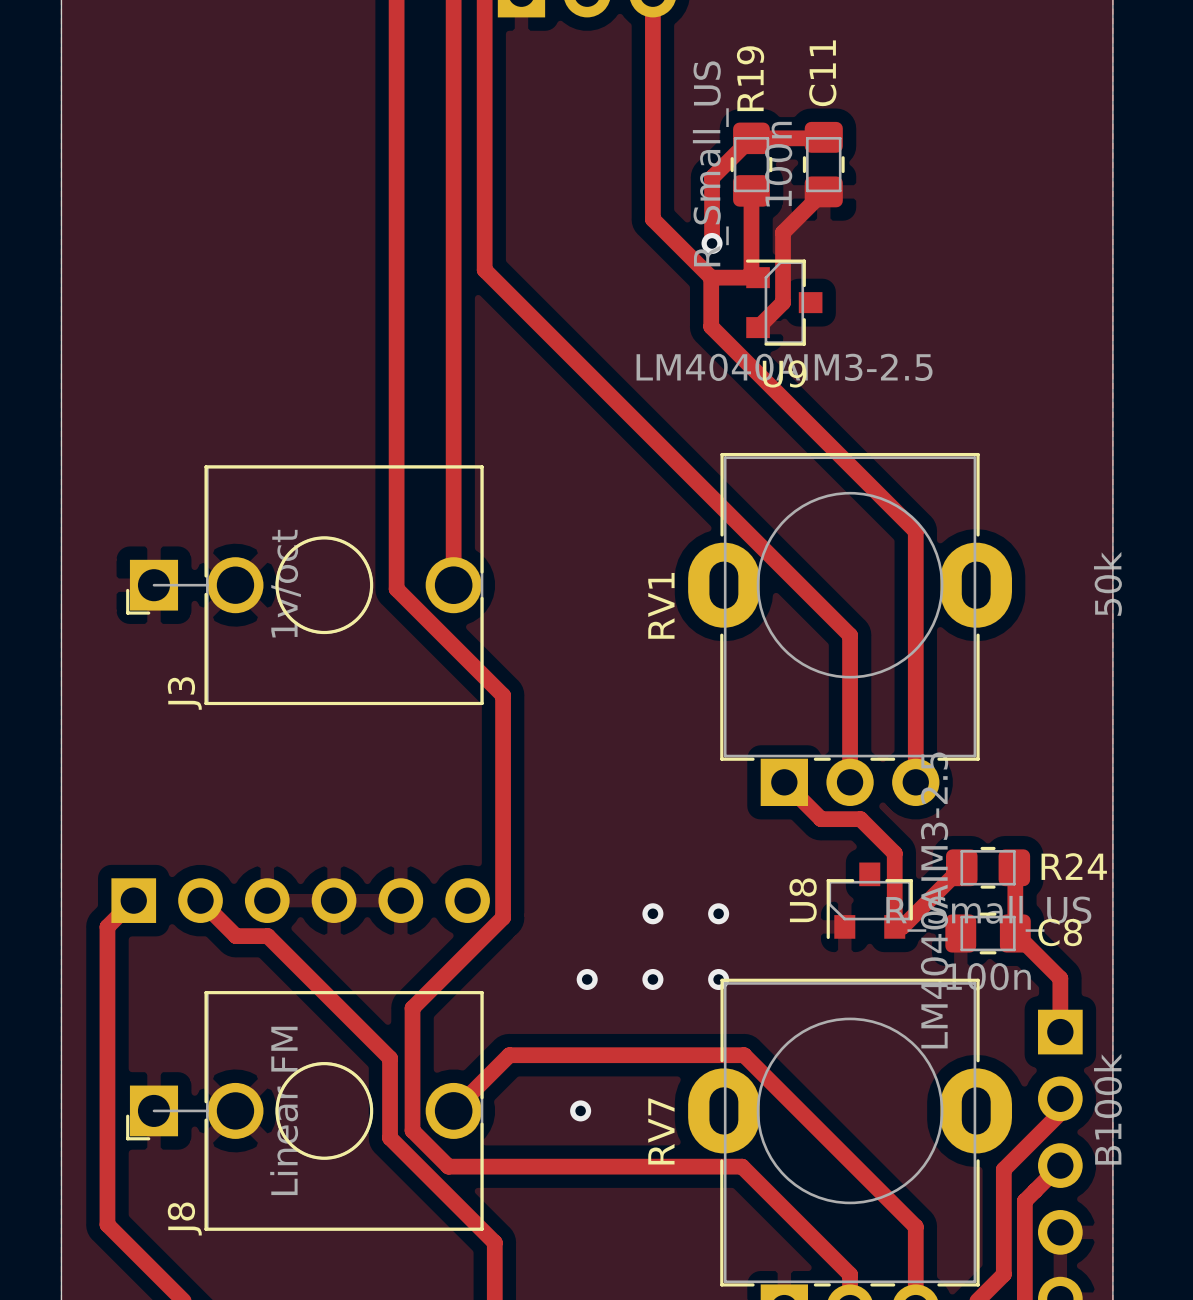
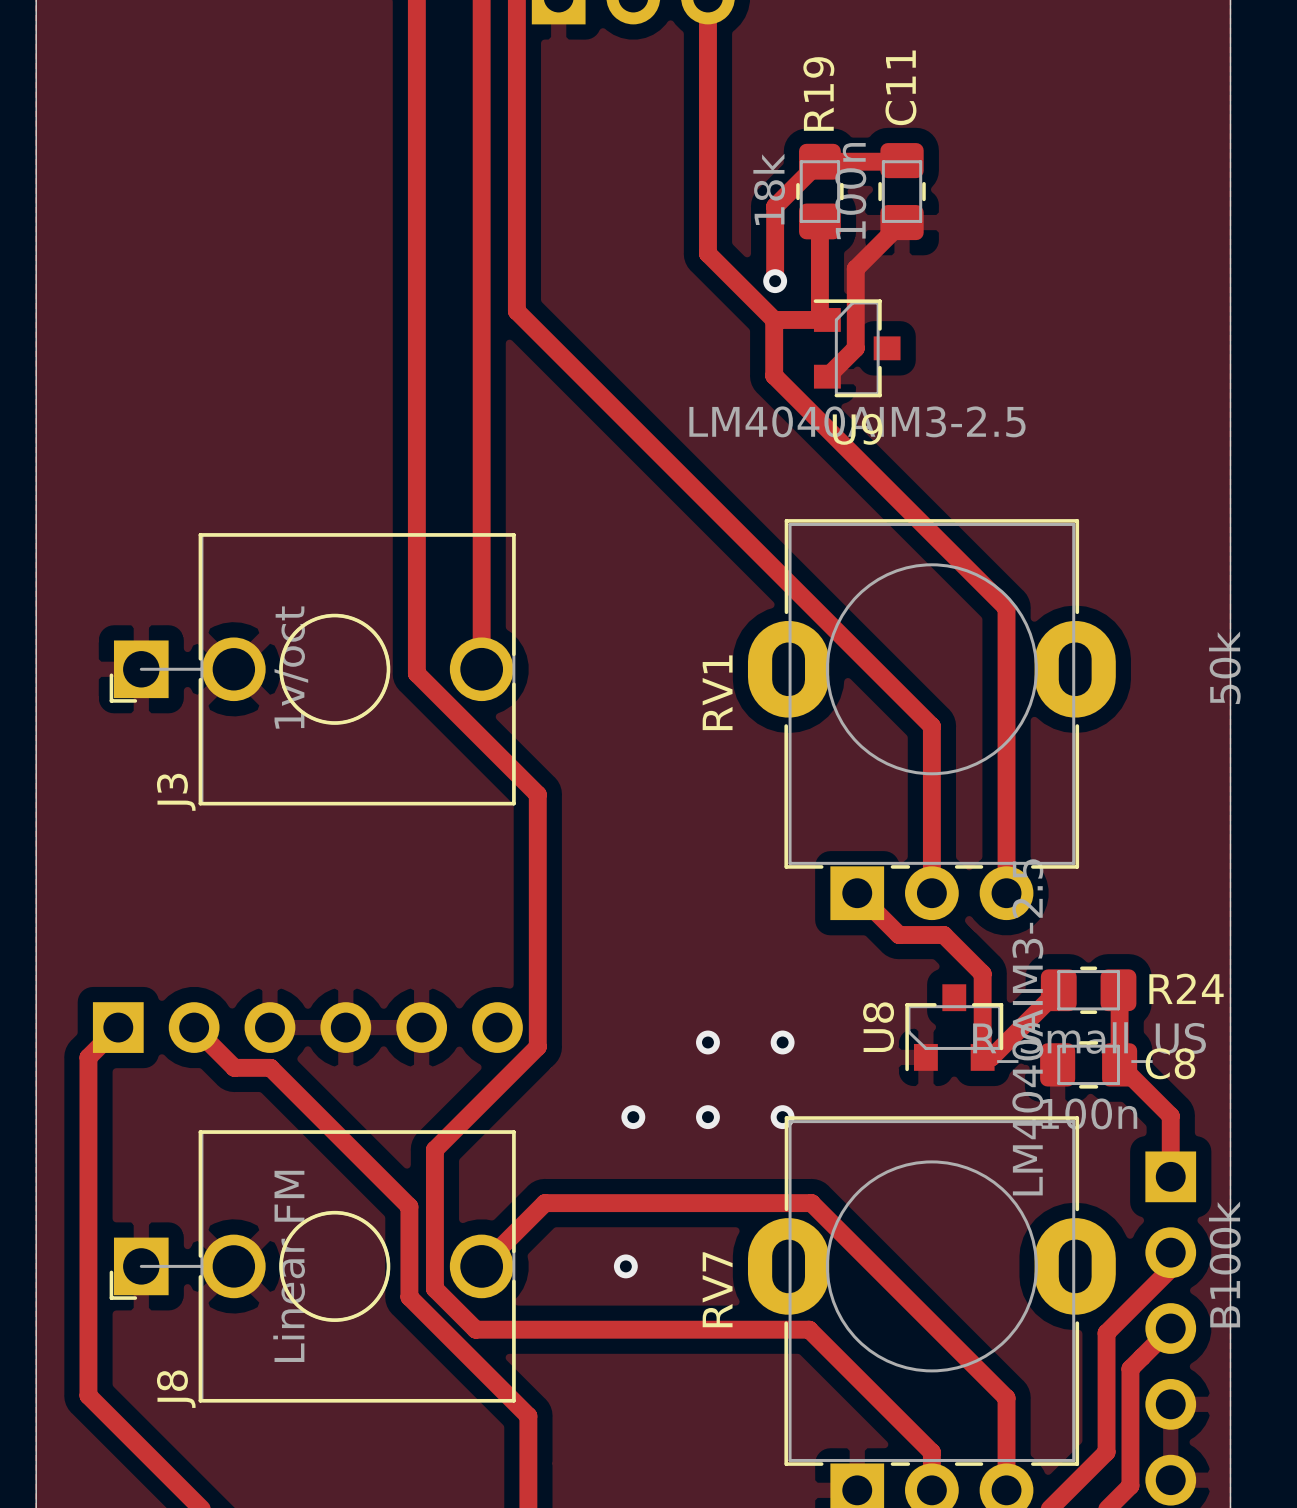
R19 value: R_Small_US (710, 163) -> 18k (769, 189)

